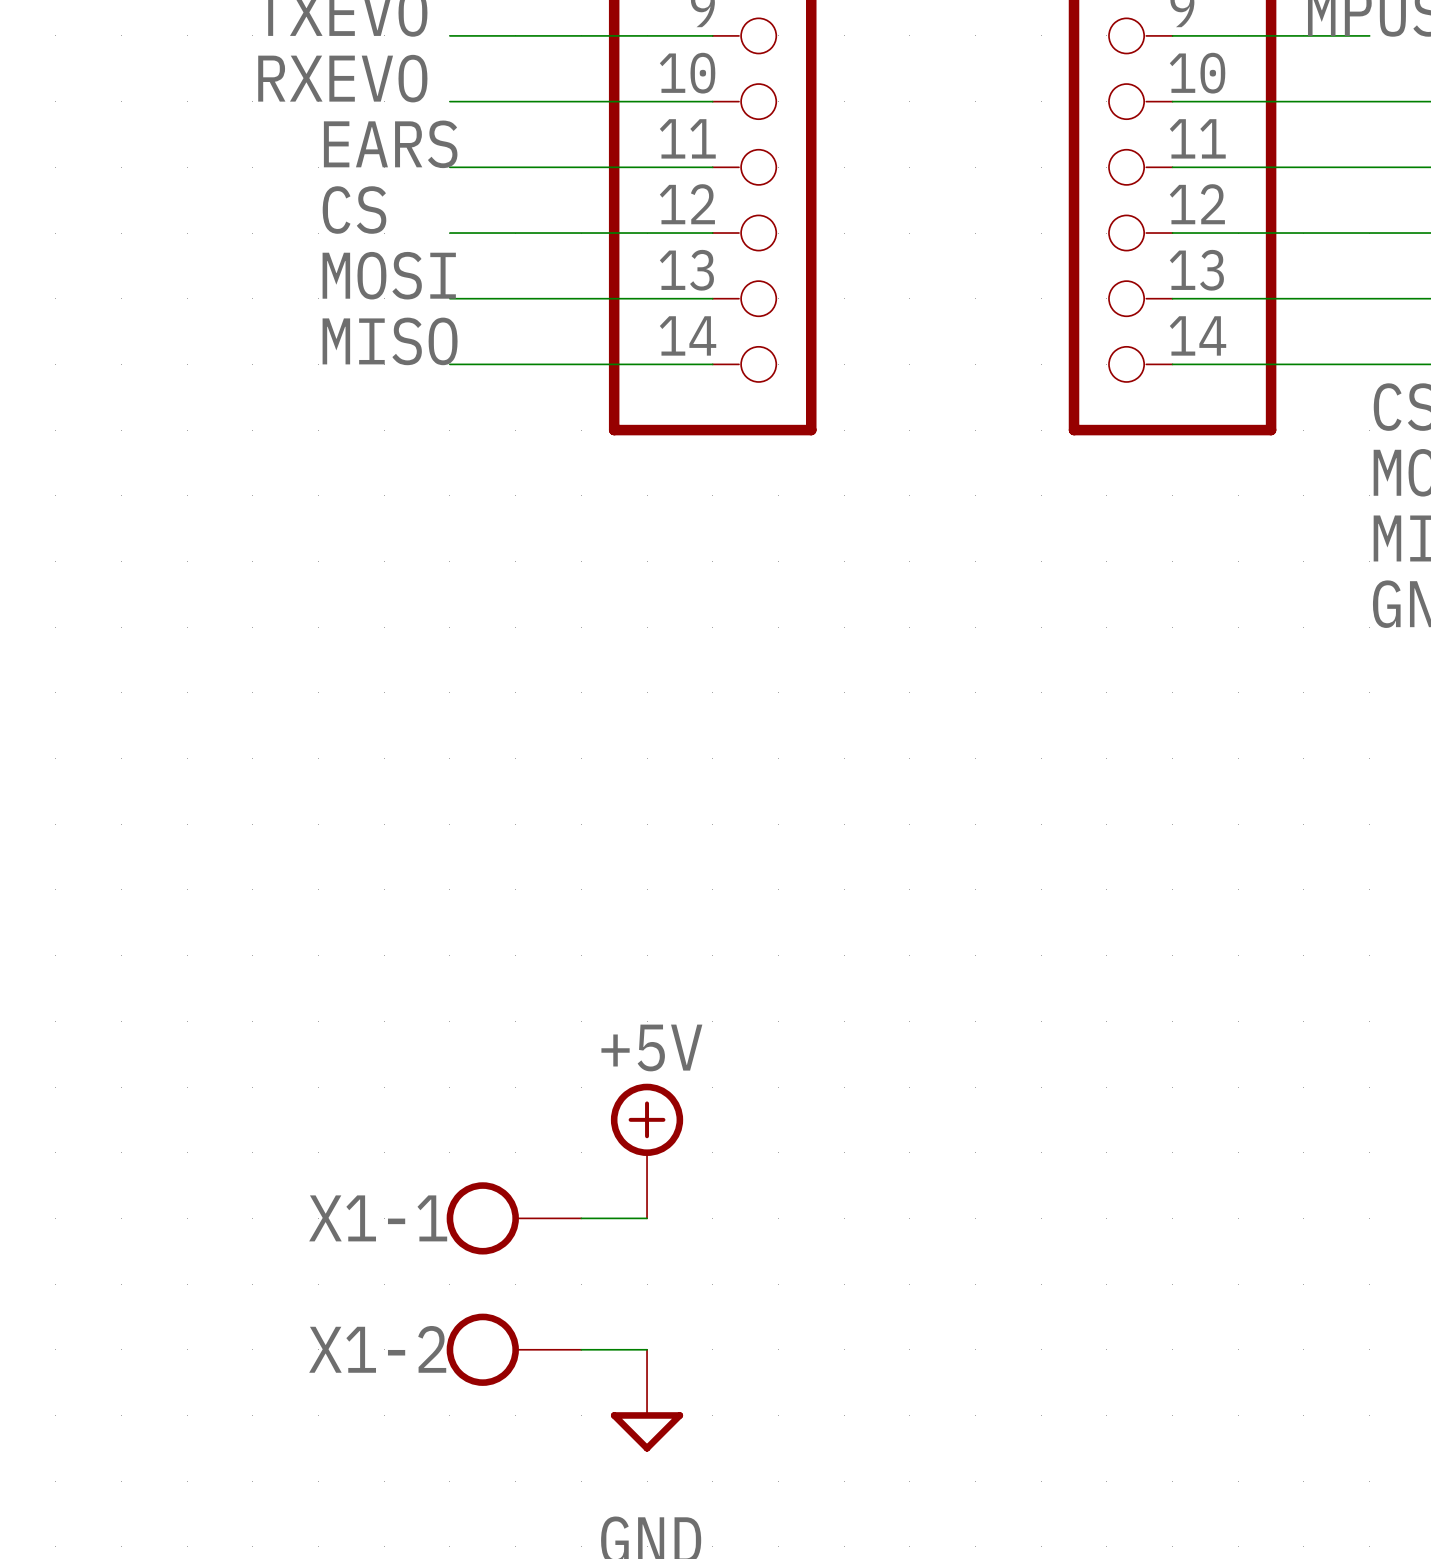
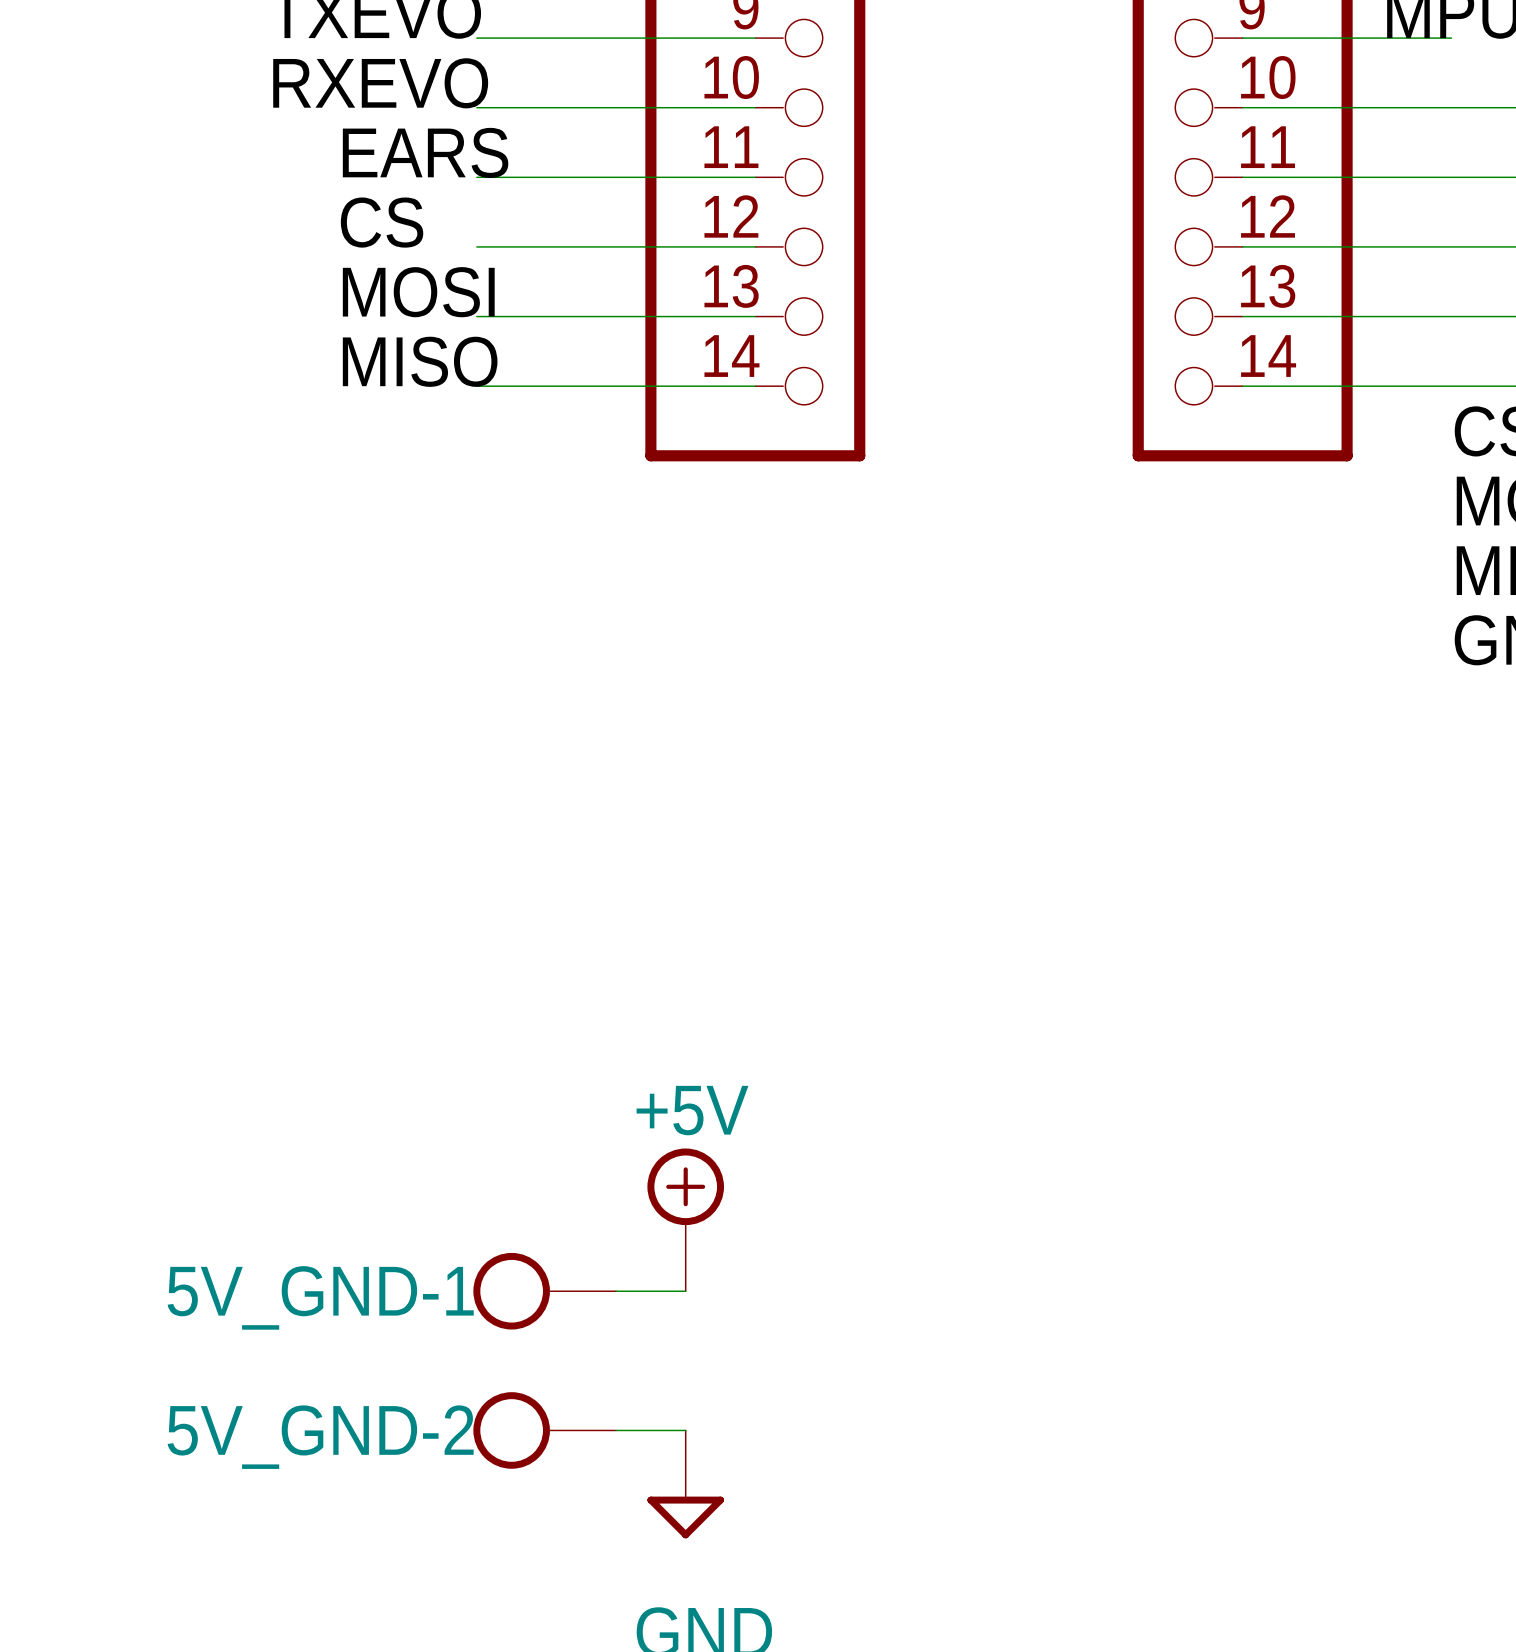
X1-1 name: X1-1 (378, 1218) -> 5V_GND-1 (320, 1297)
X1-2 name: X1-2 (377, 1349) -> 5V_GND-2 (320, 1437)

